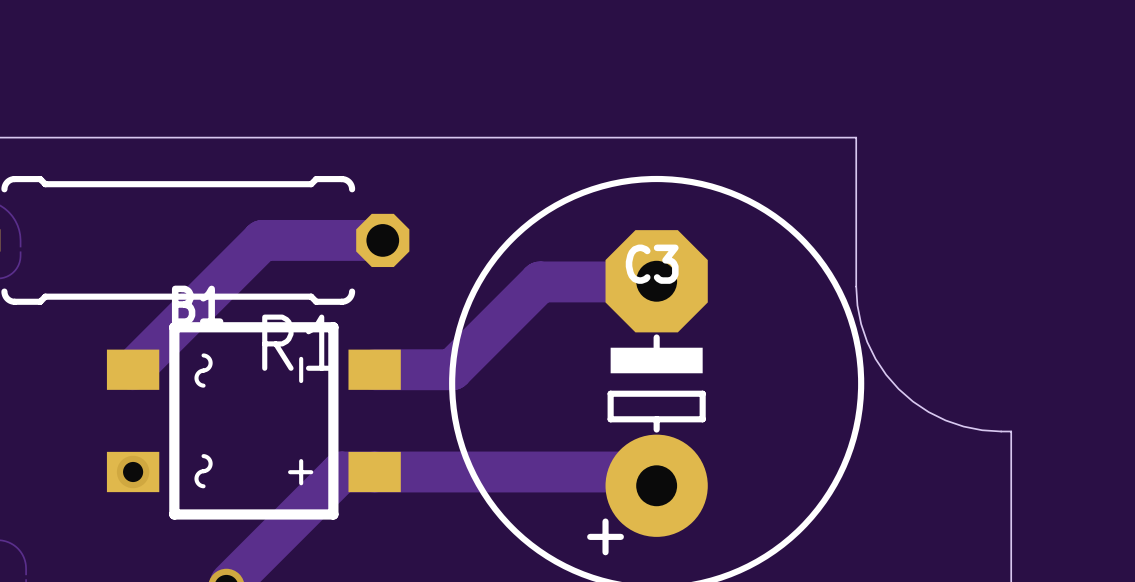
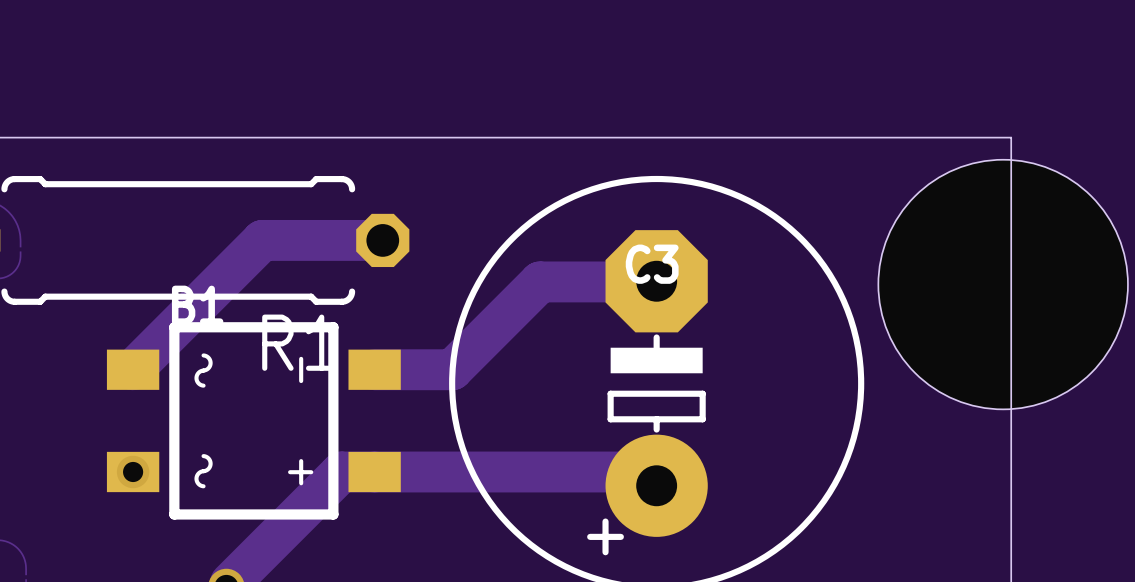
board edge: (856, 137) (857, 305) (867, 342) (875, 359) (898, 389) (928, 412) (963, 426) (982, 430) (1011, 431) -> (856, 137) (1011, 137) (1011, 431)
hole: none -> (1003, 284)

